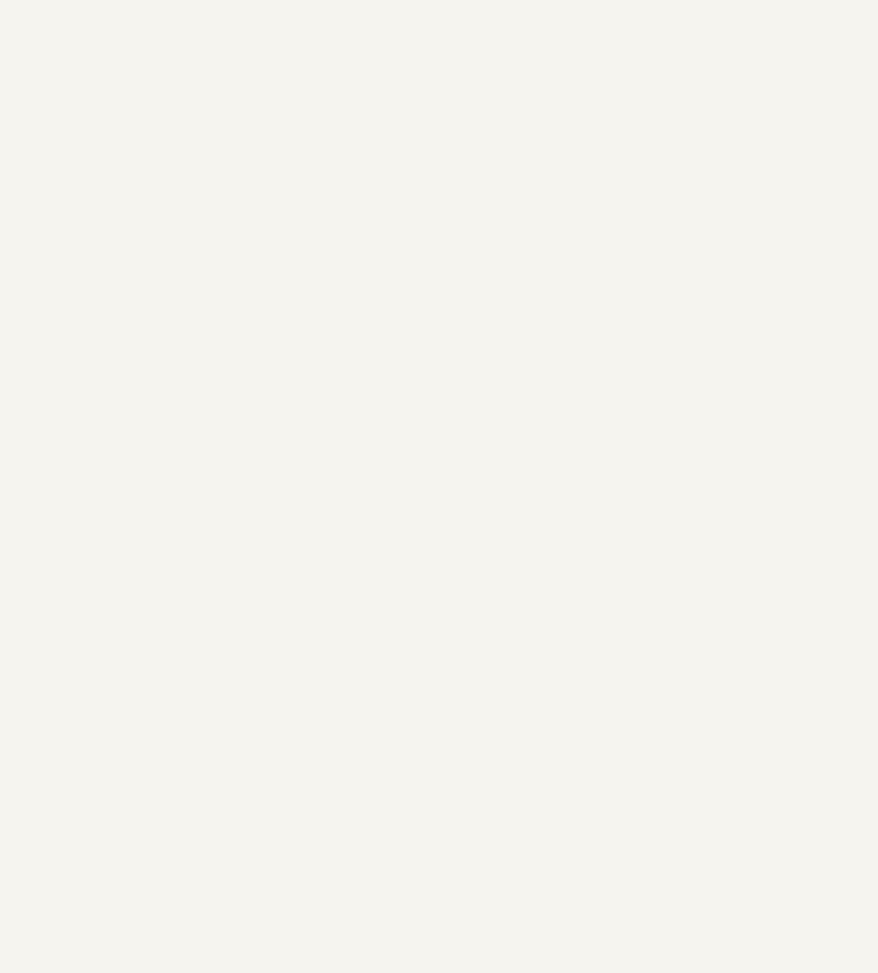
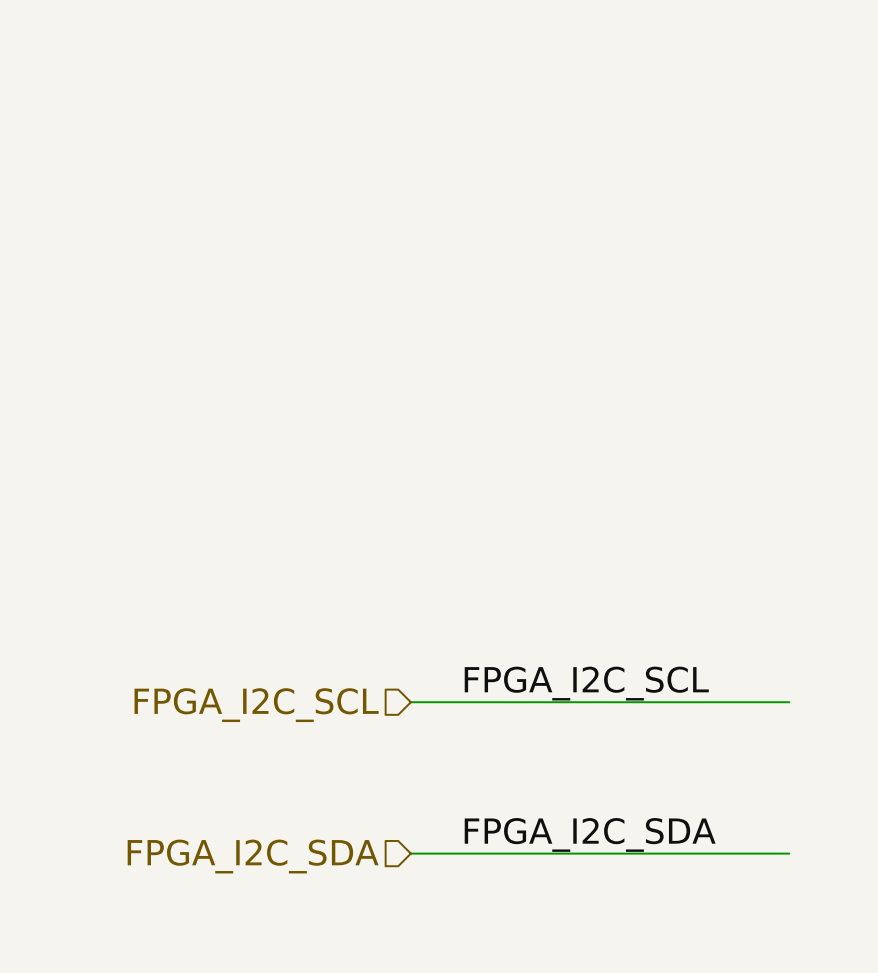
label: none -> FPGA_I2C_SCL (586, 683)
wire: none -> (410, 702) (789, 702)
hierarchical label: none -> FPGA_I2C_SCL (256, 705)
label: none -> FPGA_I2C_SDA (590, 834)
wire: none -> (410, 853) (789, 853)
hierarchical label: none -> FPGA_I2C_SDA (253, 856)

